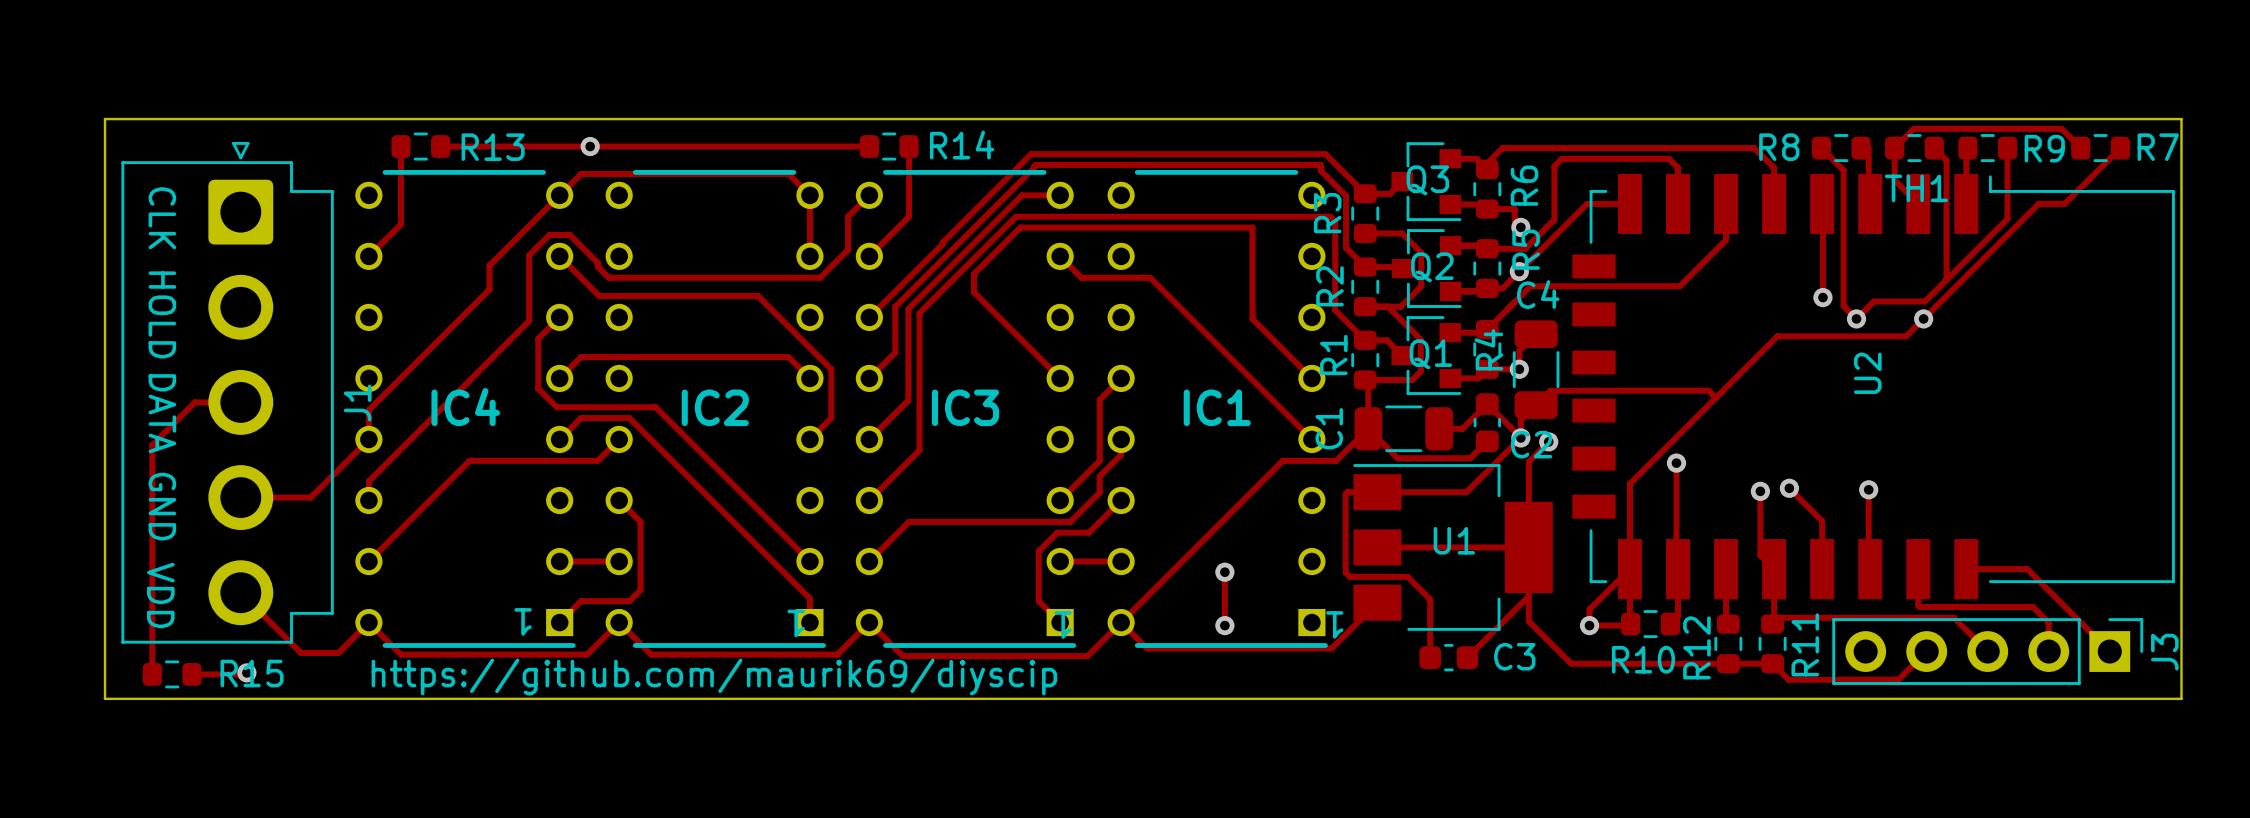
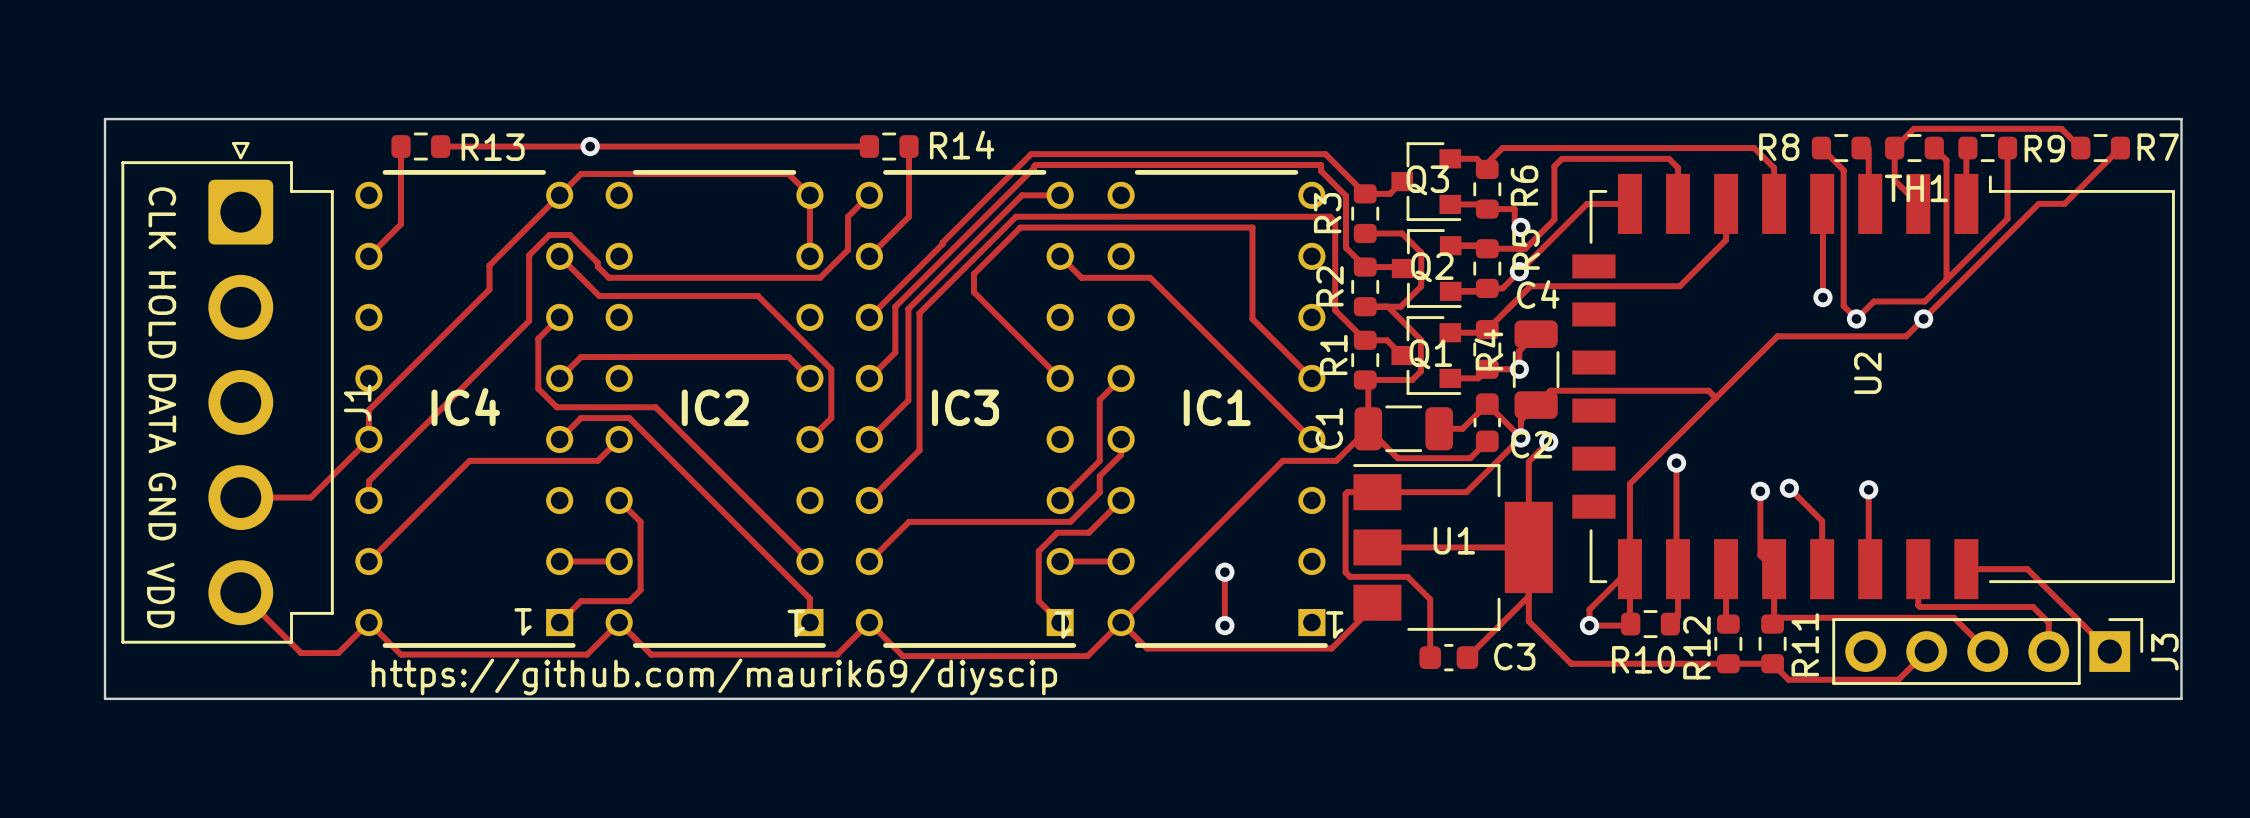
track: (240, 402) (194, 402) (152, 445) (152, 674) -> none
track: (195, 671) (191, 674) (246, 672) -> none
via: (246, 672) -> none
R15: (172, 674) -> none

